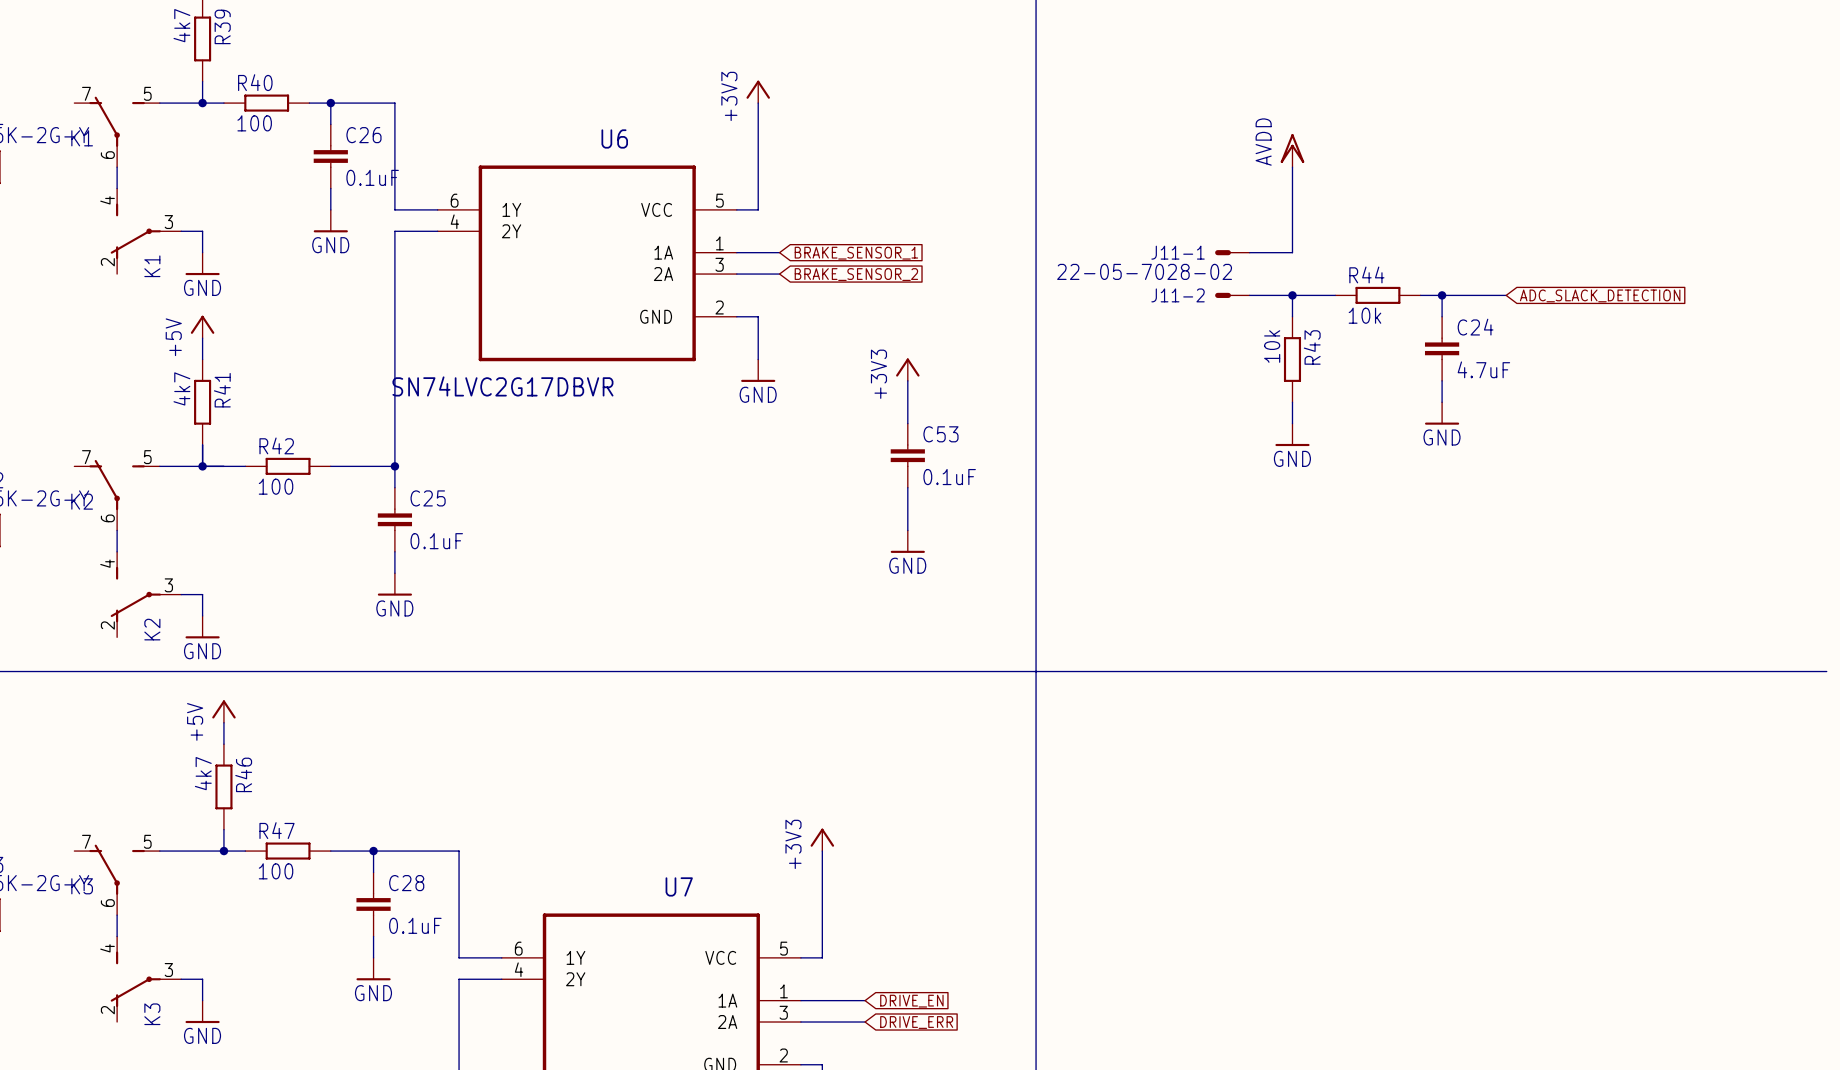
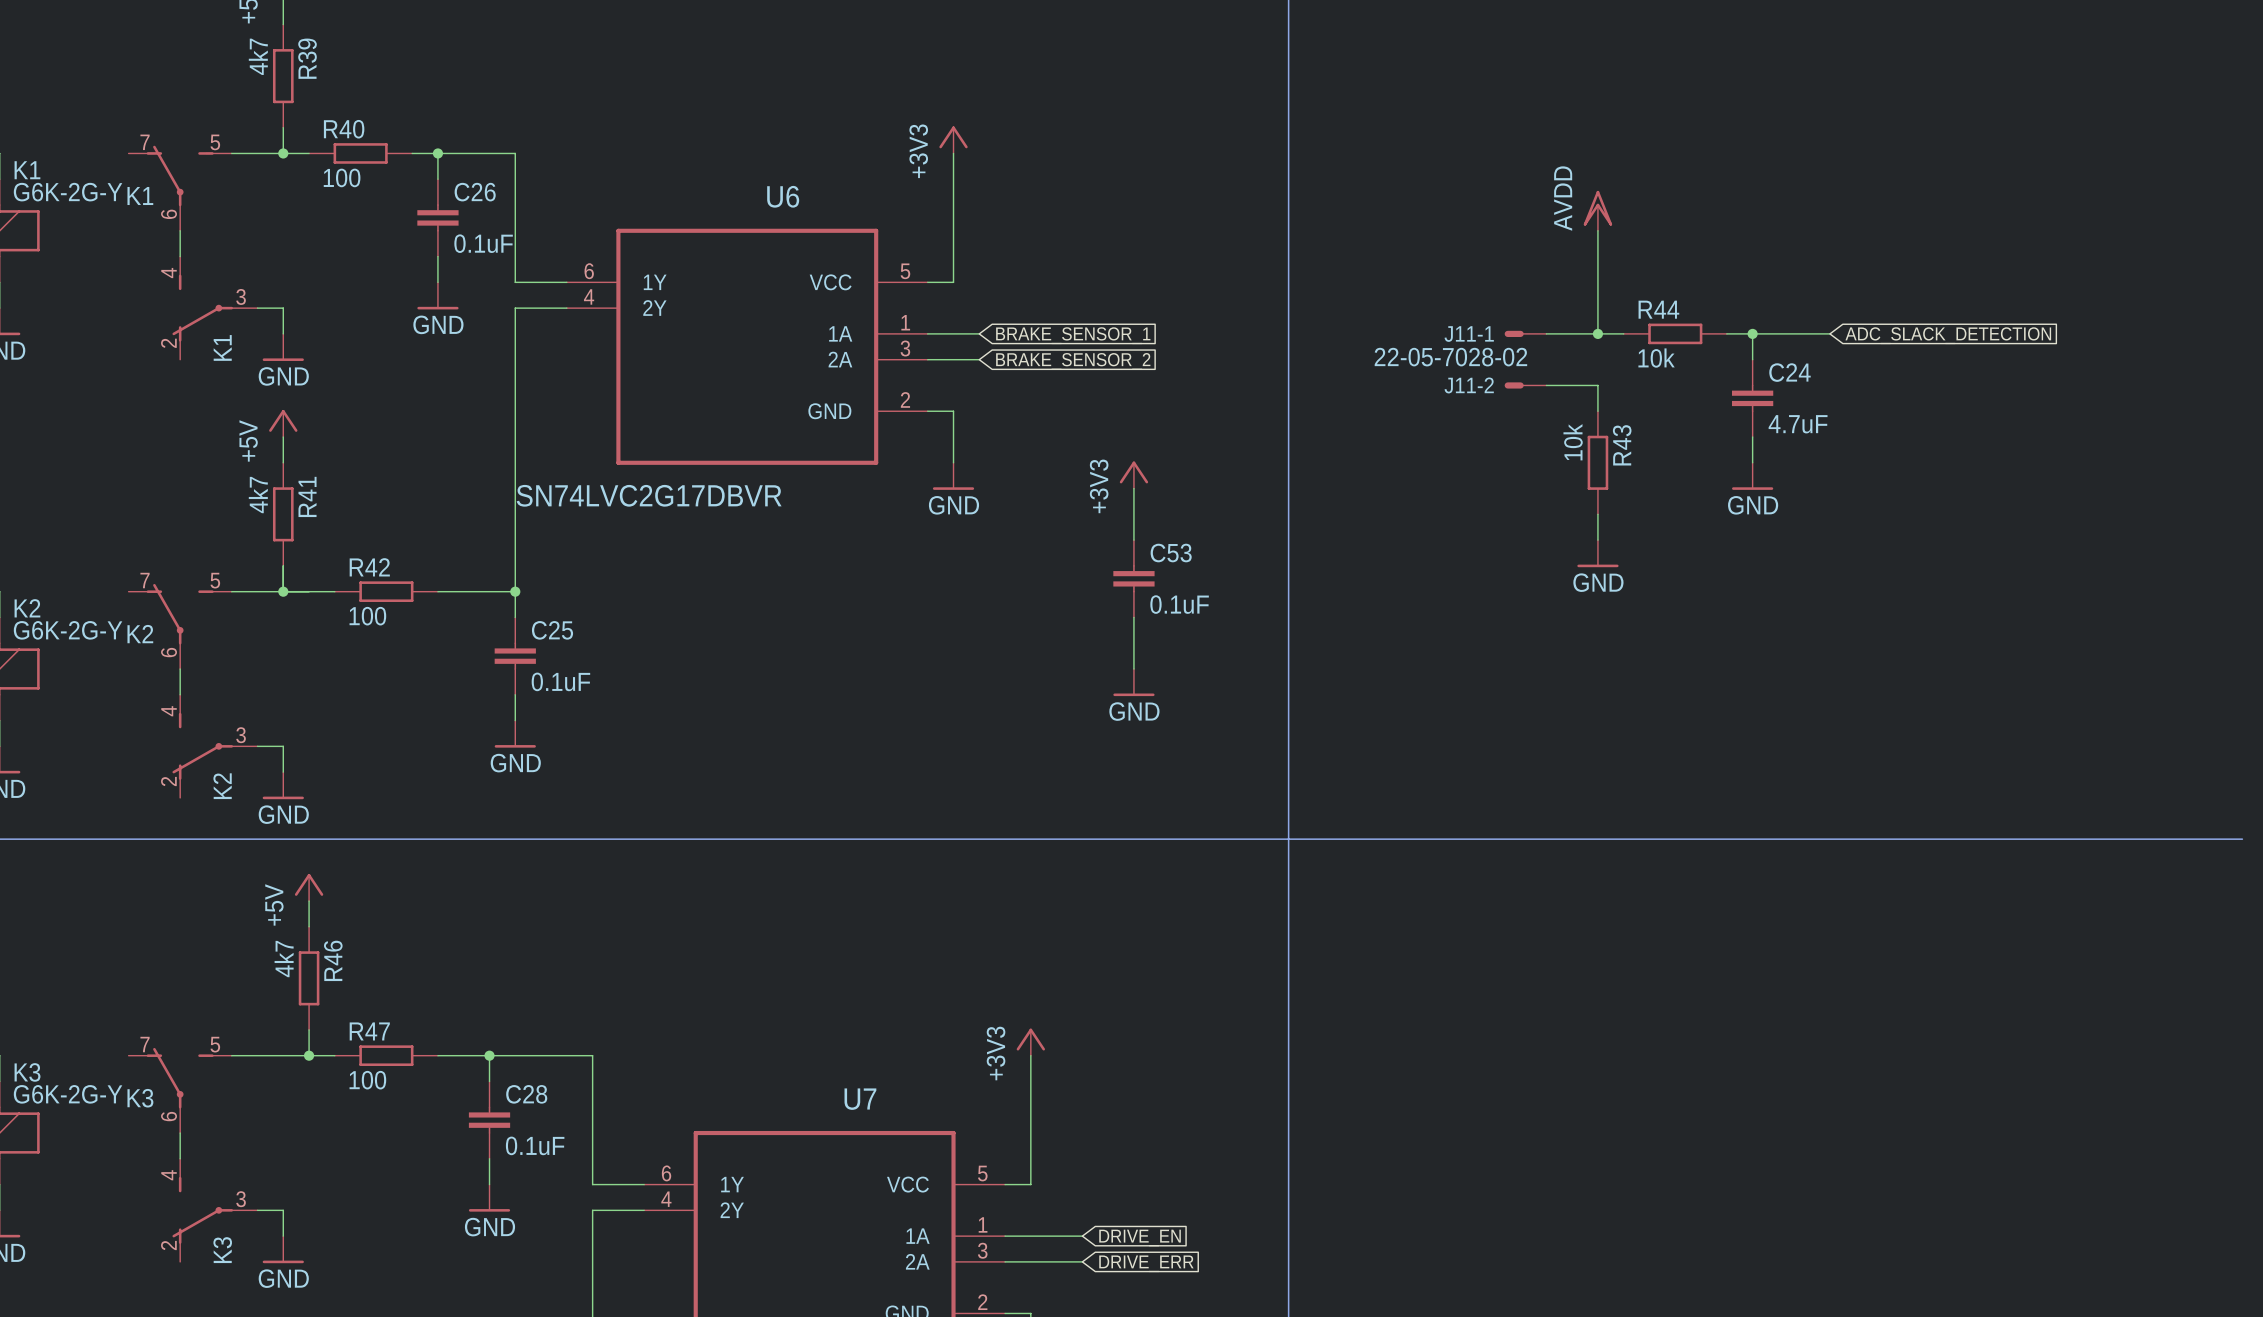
wire: none -> (1597, 333) (1623, 333)
wire: (1292, 295) (1335, 295) -> none
junction position: (1292, 295) -> (1597, 333)
R44 position: (1377, 295) -> (1675, 333)
wire: (1420, 295) (1506, 295) -> (1726, 333) (1829, 333)
wire: (1442, 295) (1442, 316) -> (1752, 333) (1752, 359)
junction position: (1442, 295) -> (1752, 333)
global label position: ADC_SLACK_DETECTION (1600, 295) -> ADC_SLACK_DETECTION (1948, 335)
C24 position: (1442, 348) -> (1752, 398)
wire: (1442, 380) (1442, 402) -> (1752, 437) (1752, 462)
power symbol position: GND (1442, 413) -> GND (1752, 476)

